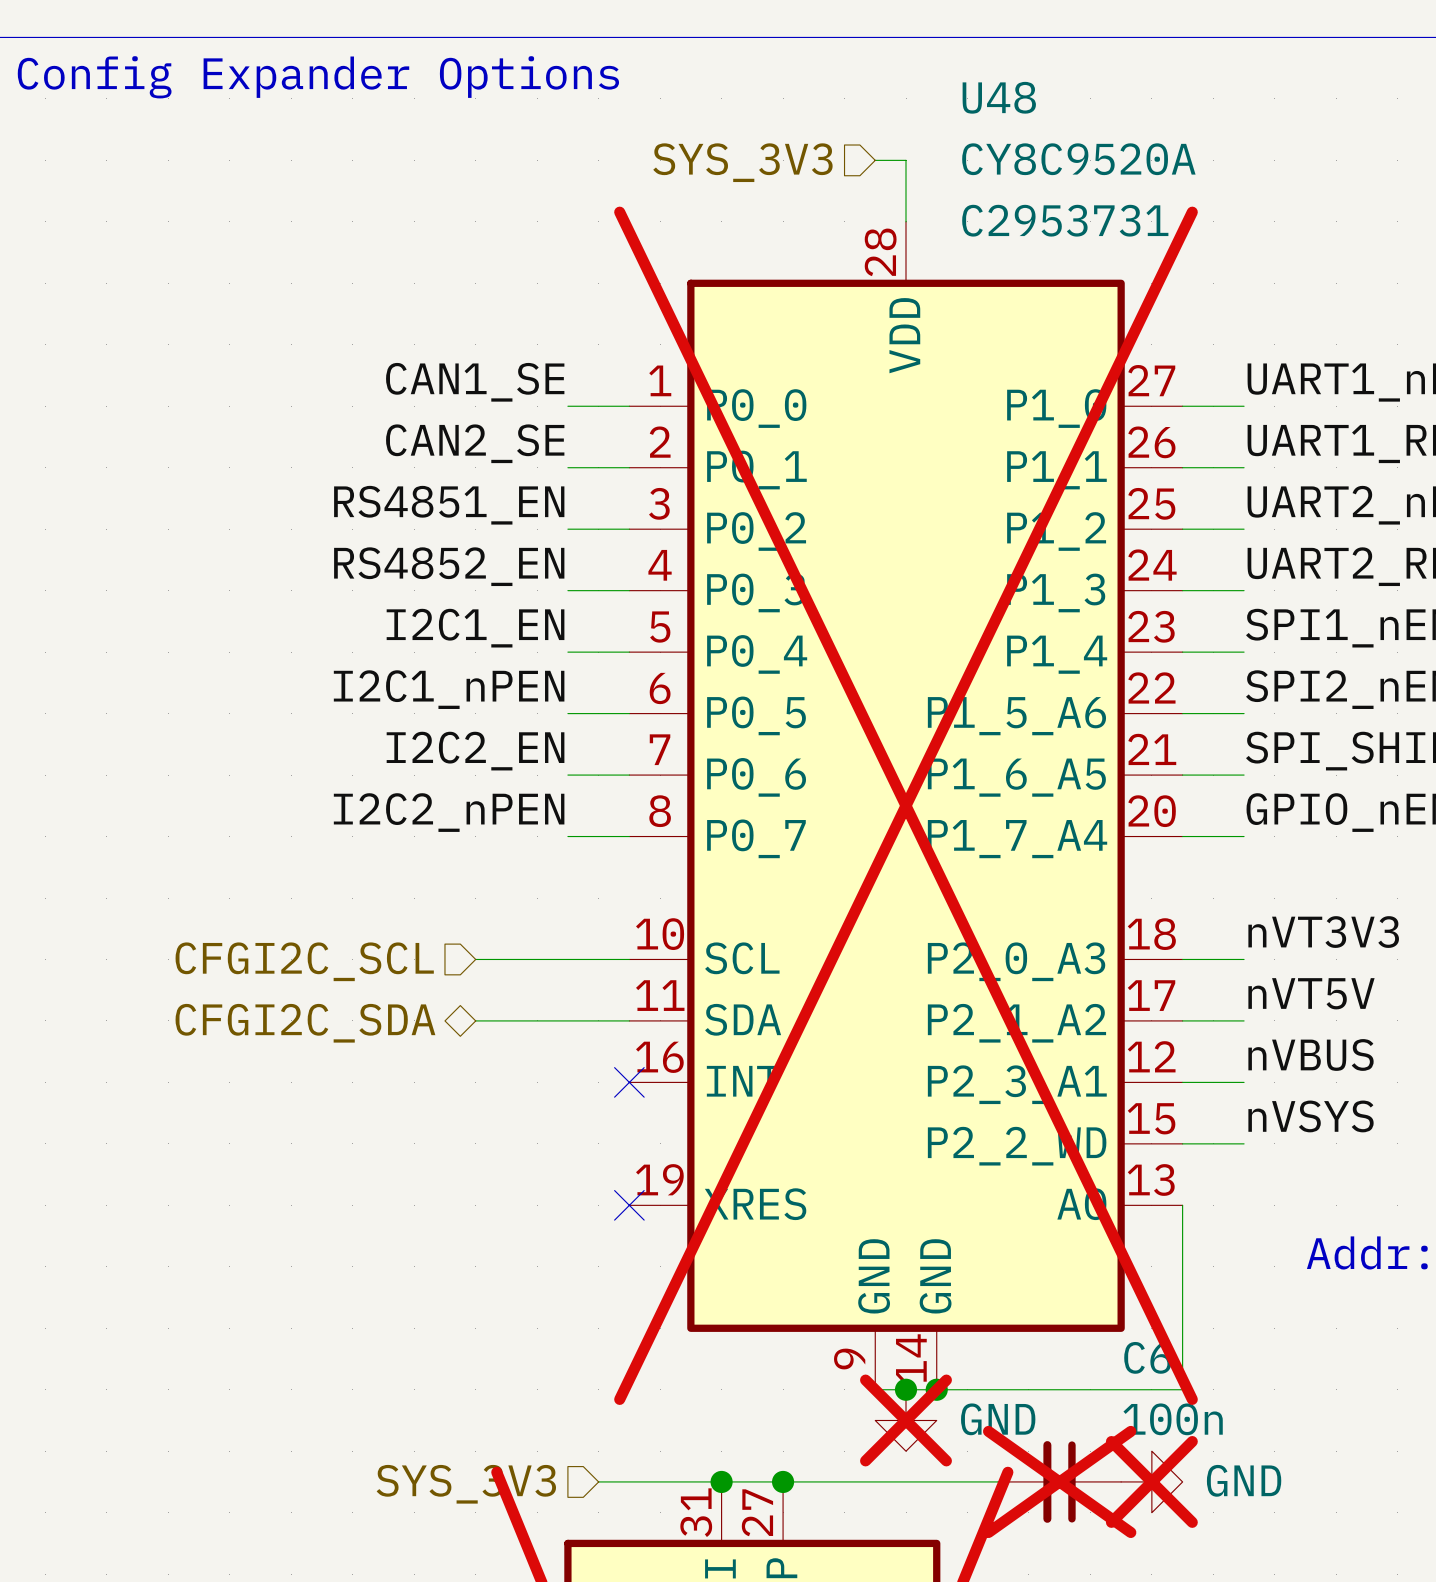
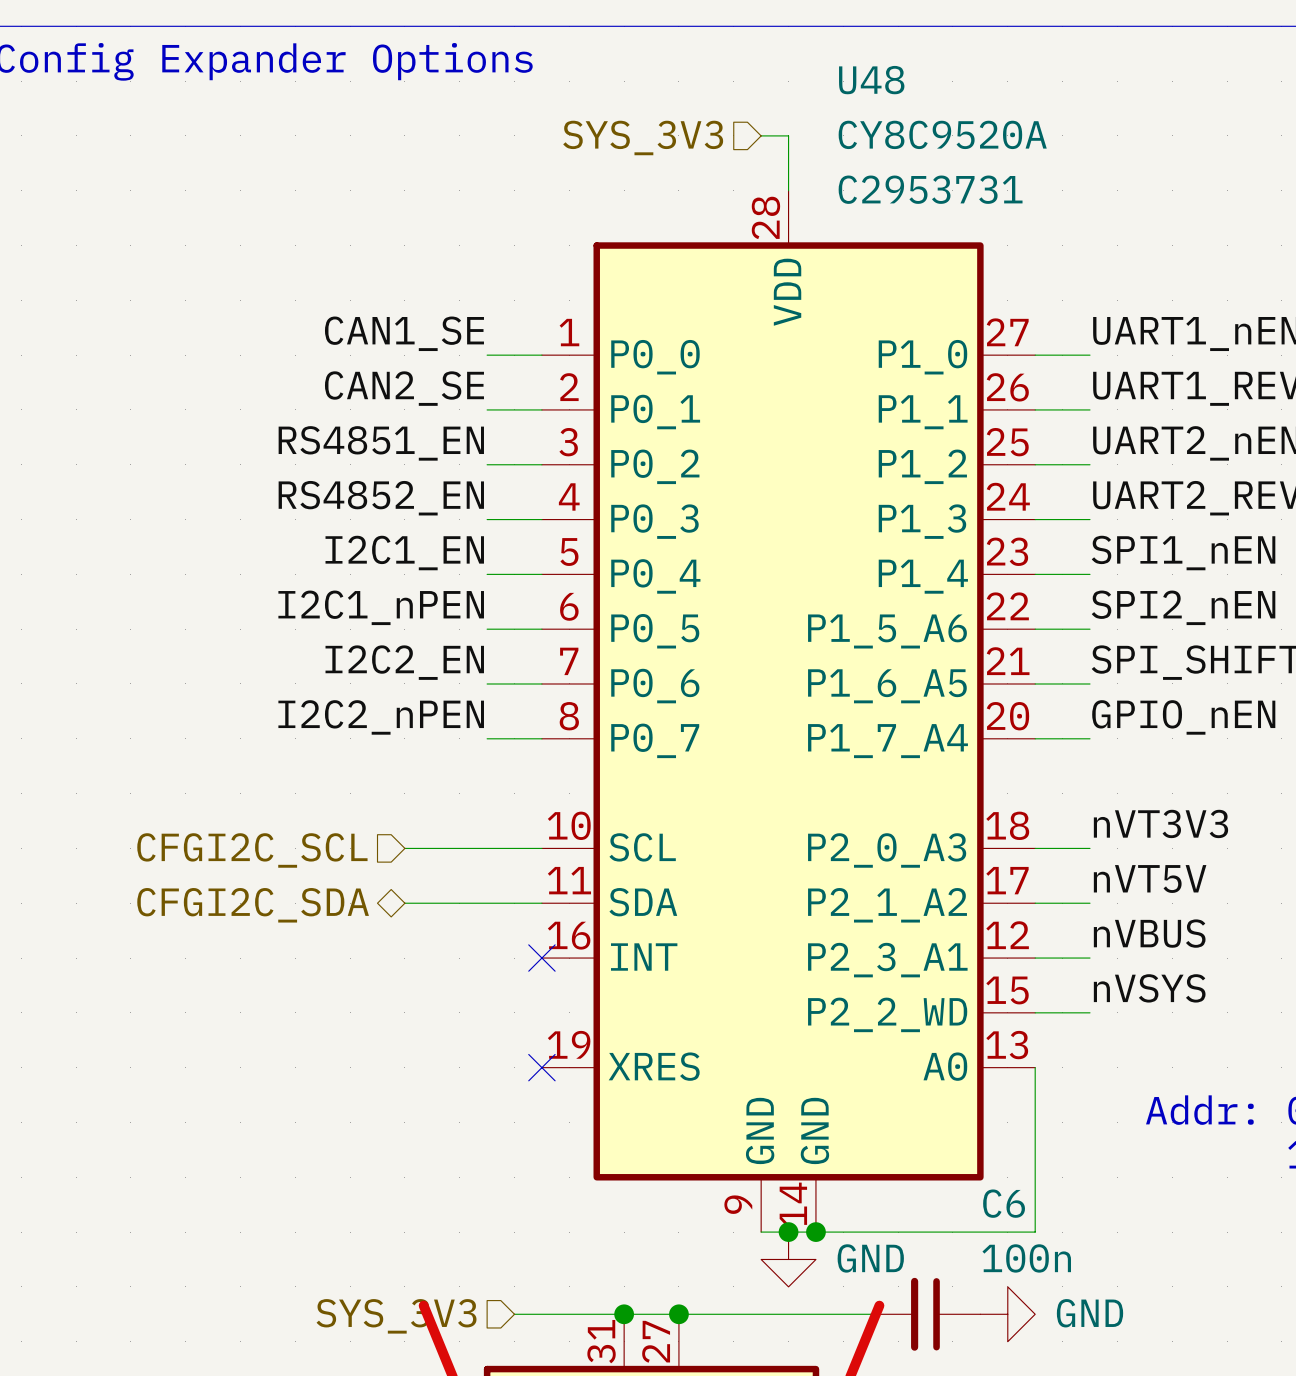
U48 do-not-place cross: (906, 805) -> none
power symbol do-not-place cross: (906, 1420) -> none
C6 do-not-place cross: (1059, 1481) -> none
power symbol do-not-place cross: (1151, 1481) -> none

